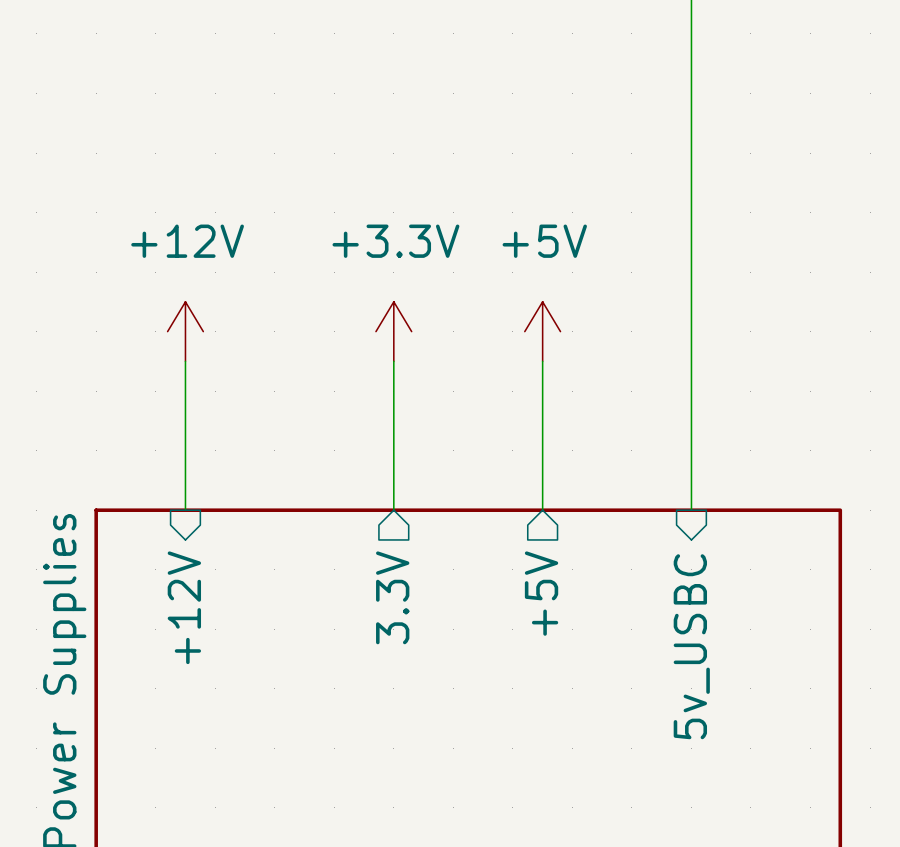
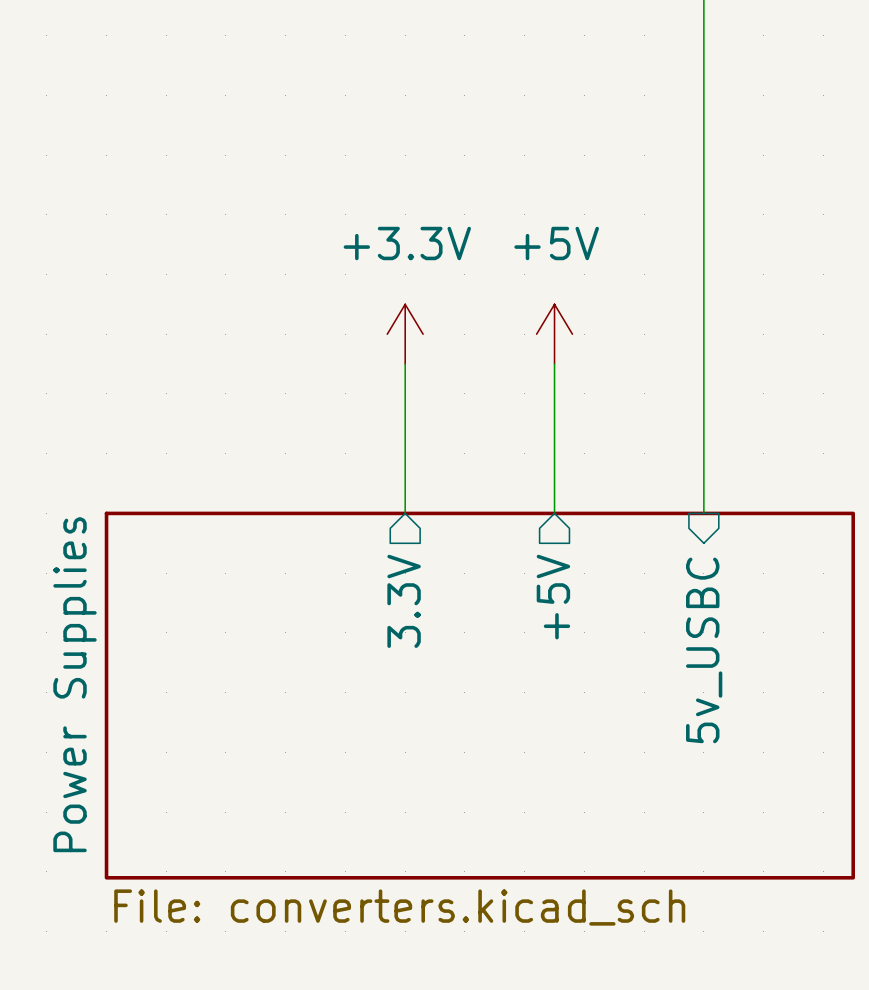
power symbol: +12V (185, 331) -> none
wire: (185, 361) (185, 510) -> none
sheet pin: +12V (184, 607) -> none

